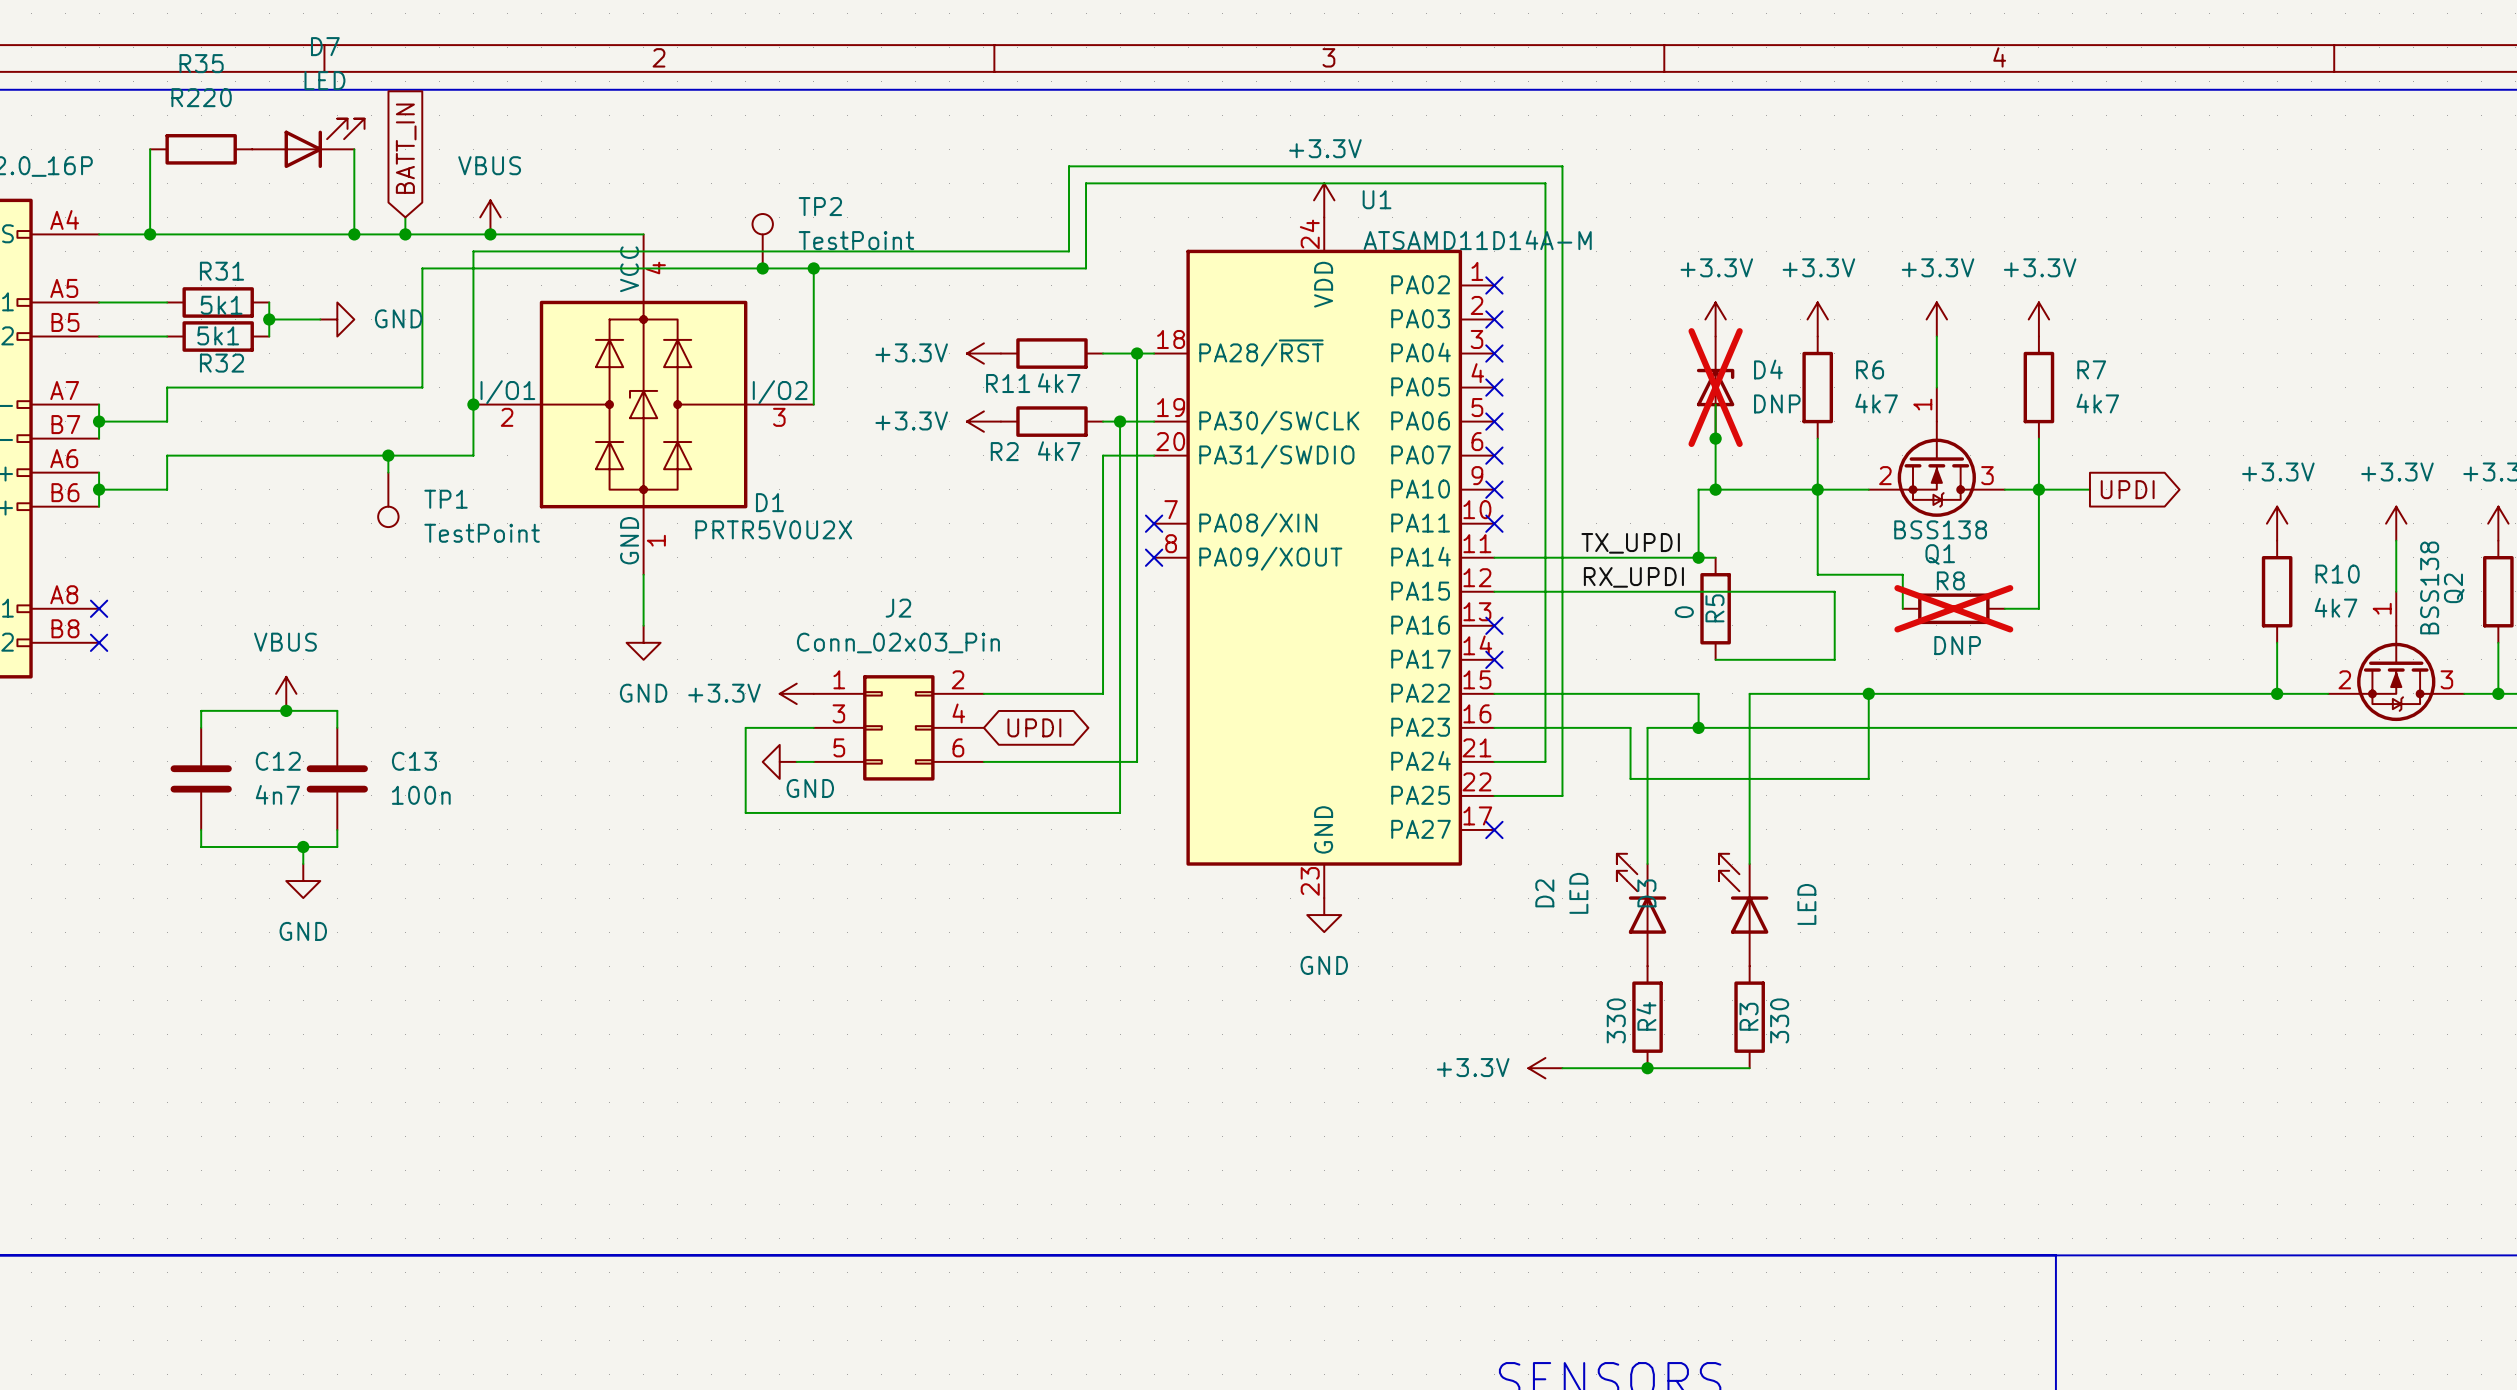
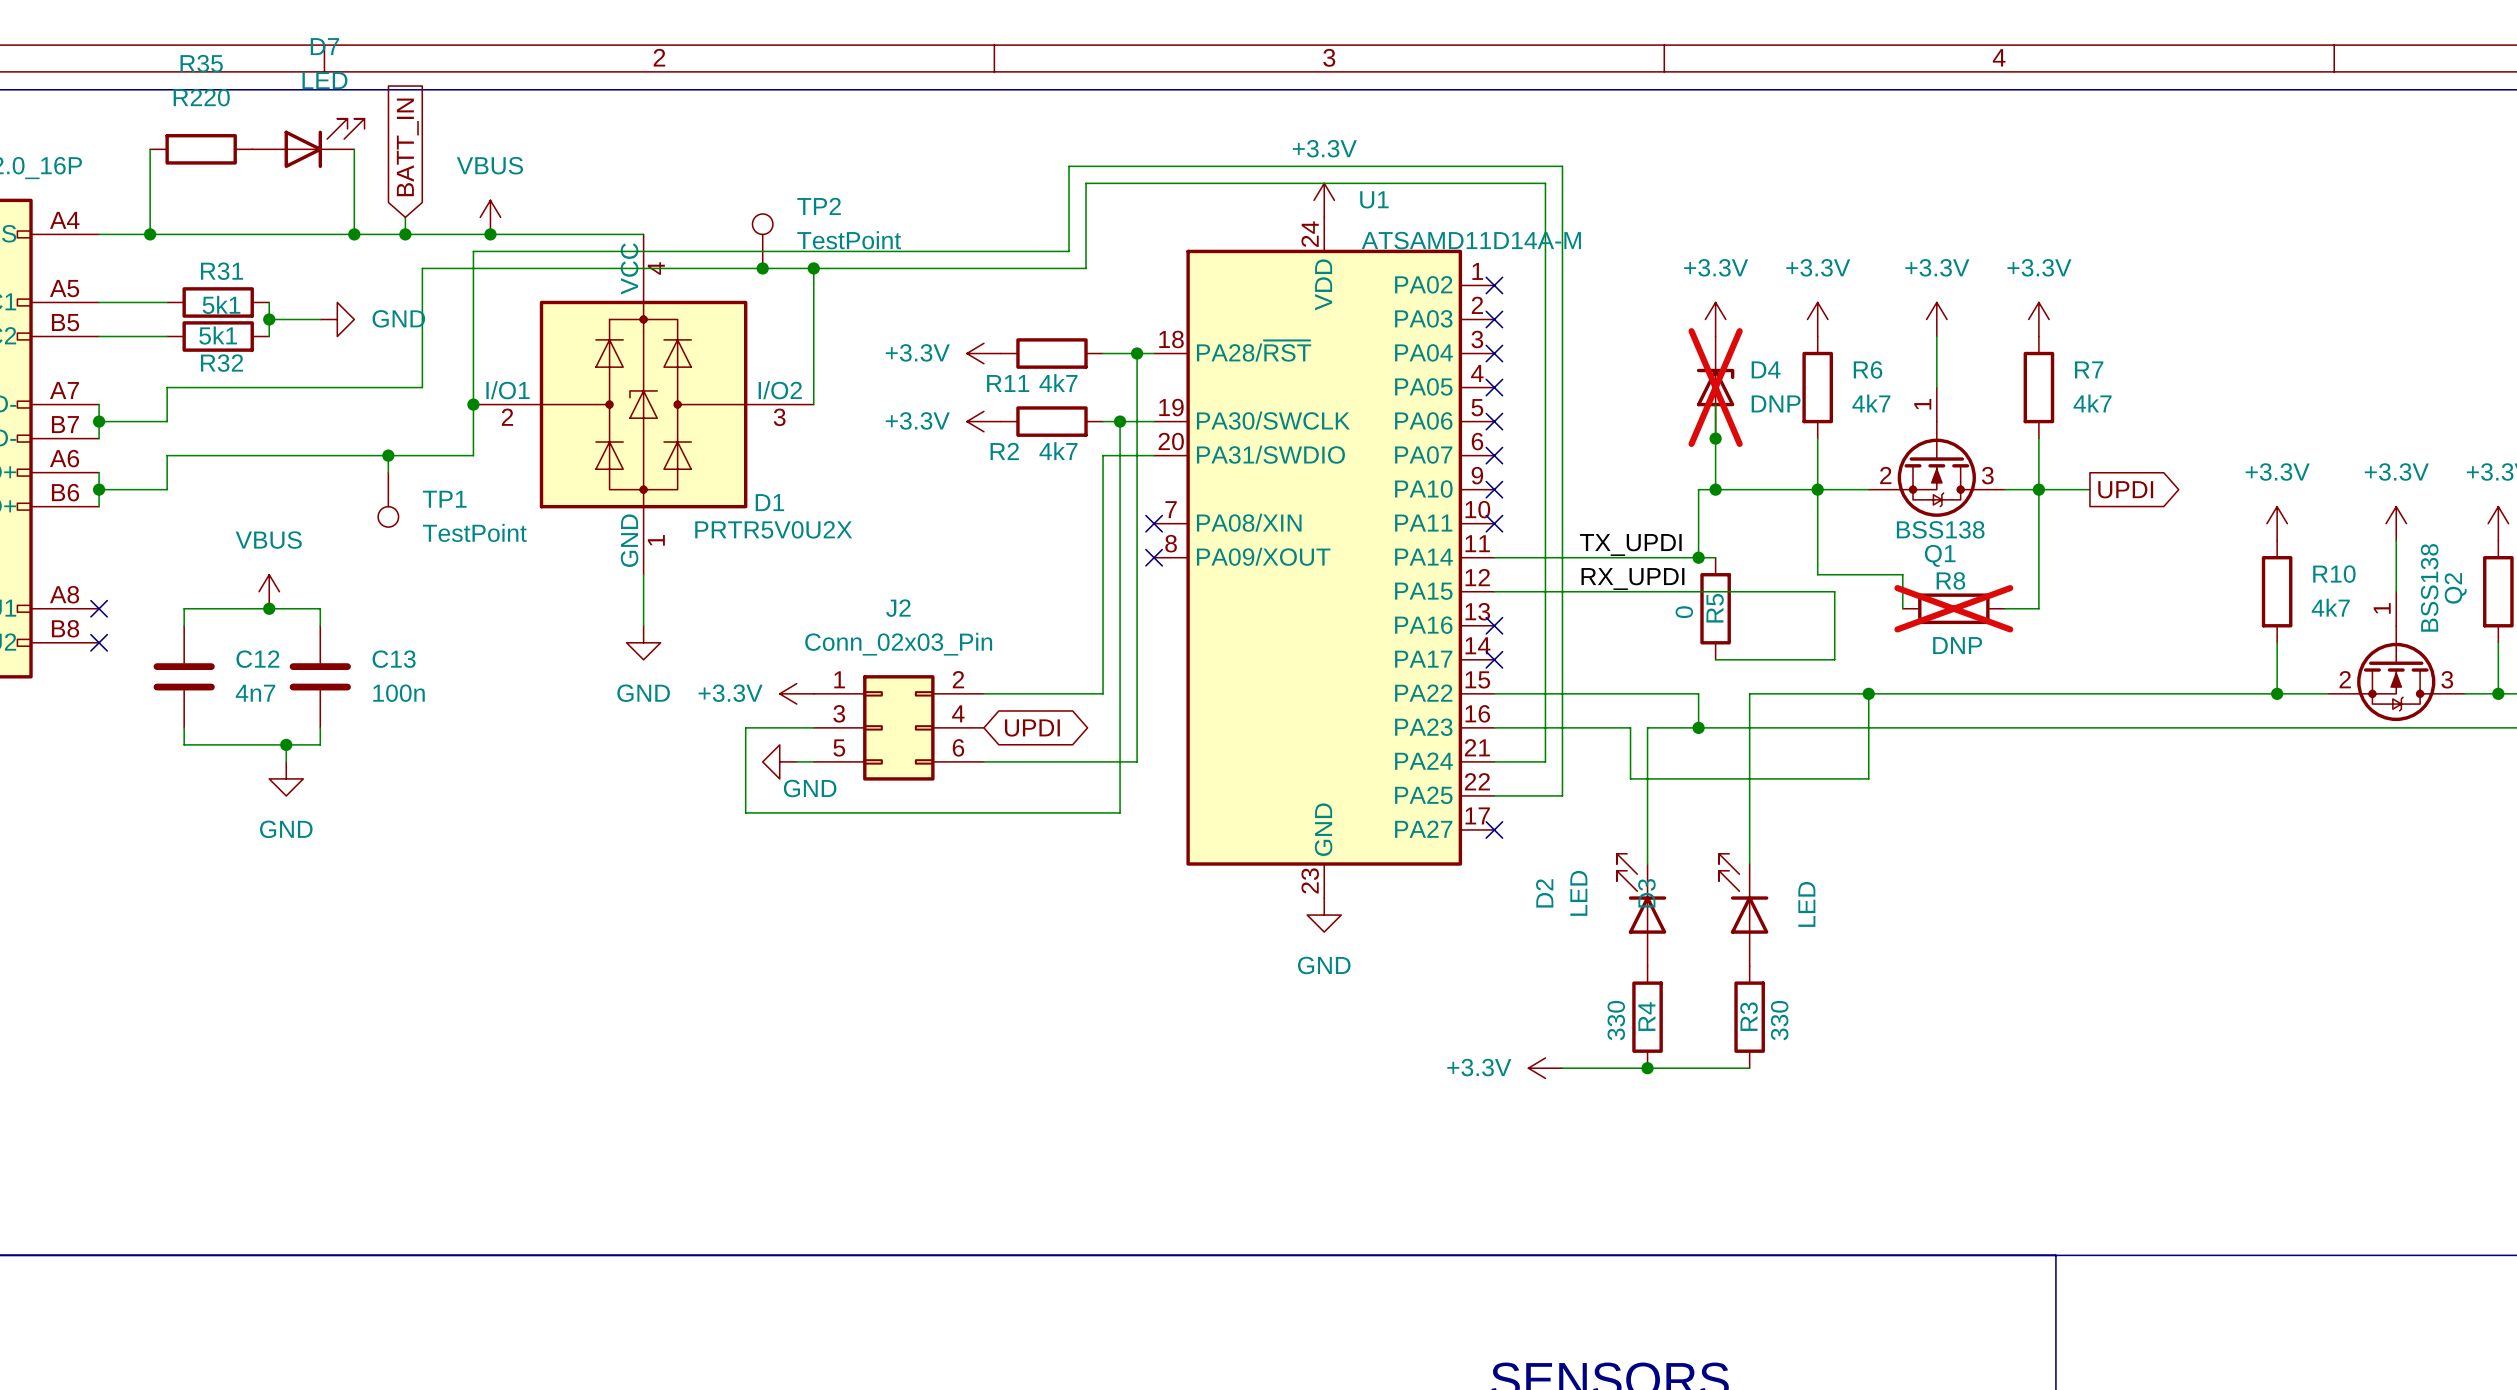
junction: none -> (269, 608)
power symbol position: VBUS (286, 693) -> VBUS (269, 591)
junction position: (286, 710) -> (286, 744)
wire: (201, 727) (201, 710) (337, 710) (337, 727) -> (184, 625) (184, 608) (320, 608) (320, 625)
C12 position: (201, 778) -> (184, 676)
C13 position: (337, 778) -> (320, 676)
wire: (201, 829) (201, 846) (337, 846) (337, 829) -> (184, 727) (184, 744) (320, 744) (320, 727)
wire: (303, 846) (303, 864) -> (286, 744) (286, 761)
junction: (303, 846) -> none
power symbol position: GND (303, 881) -> GND (286, 778)

